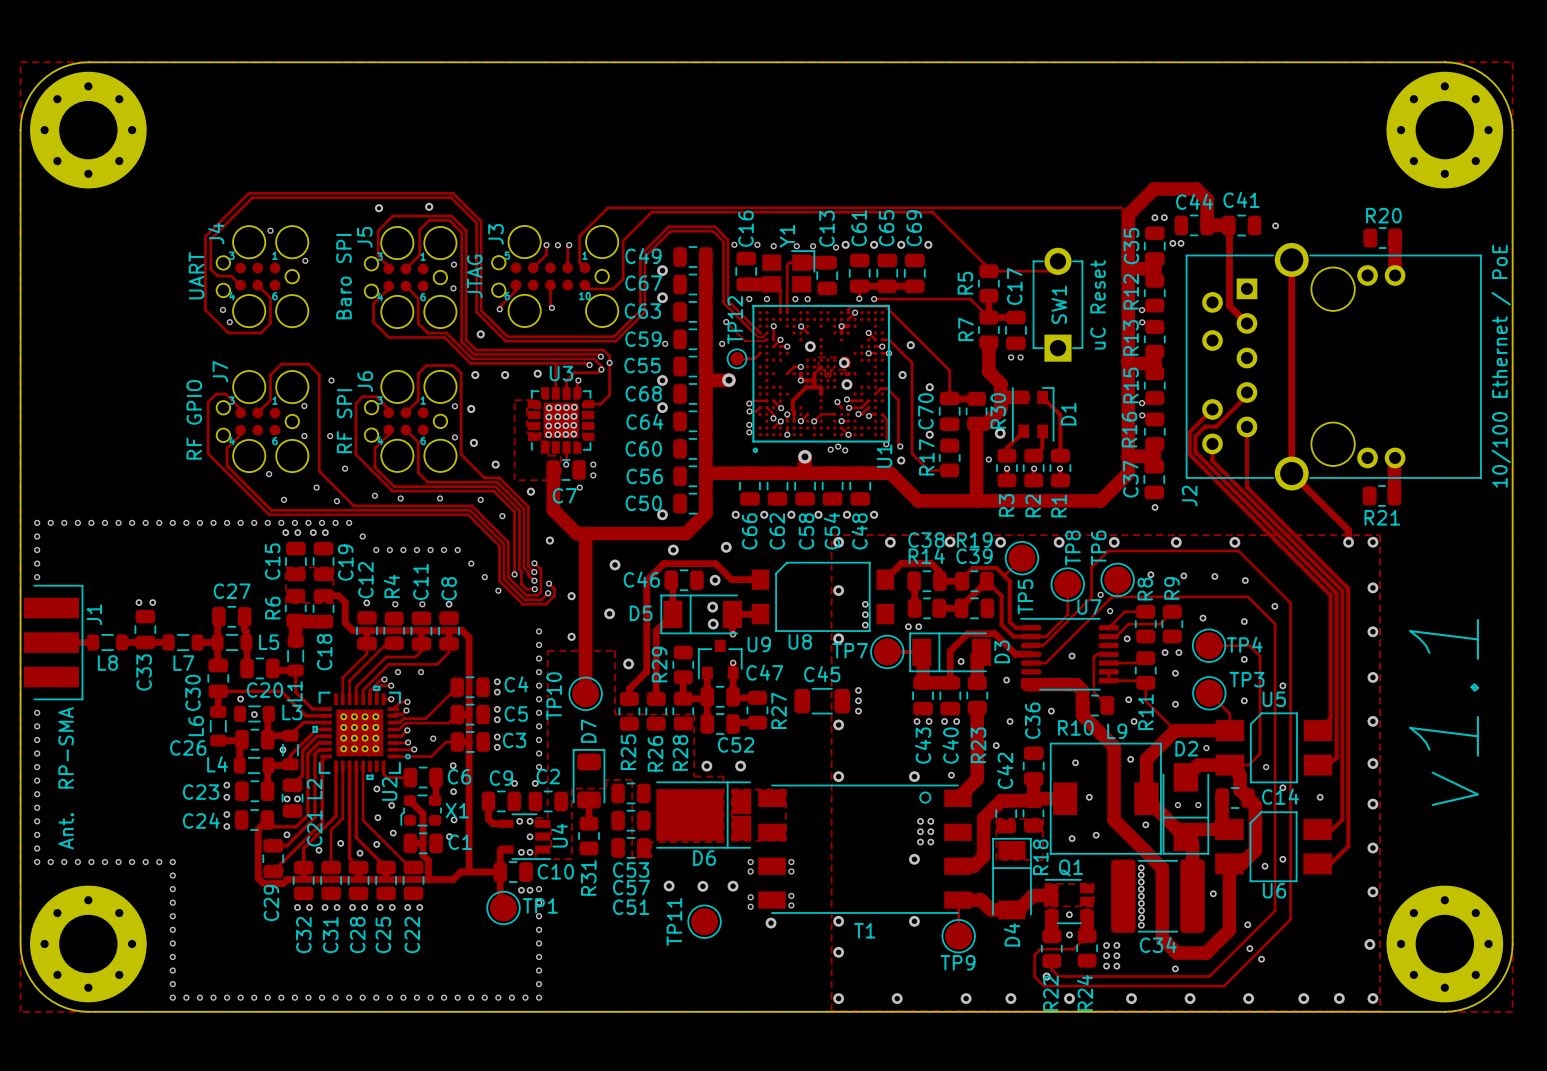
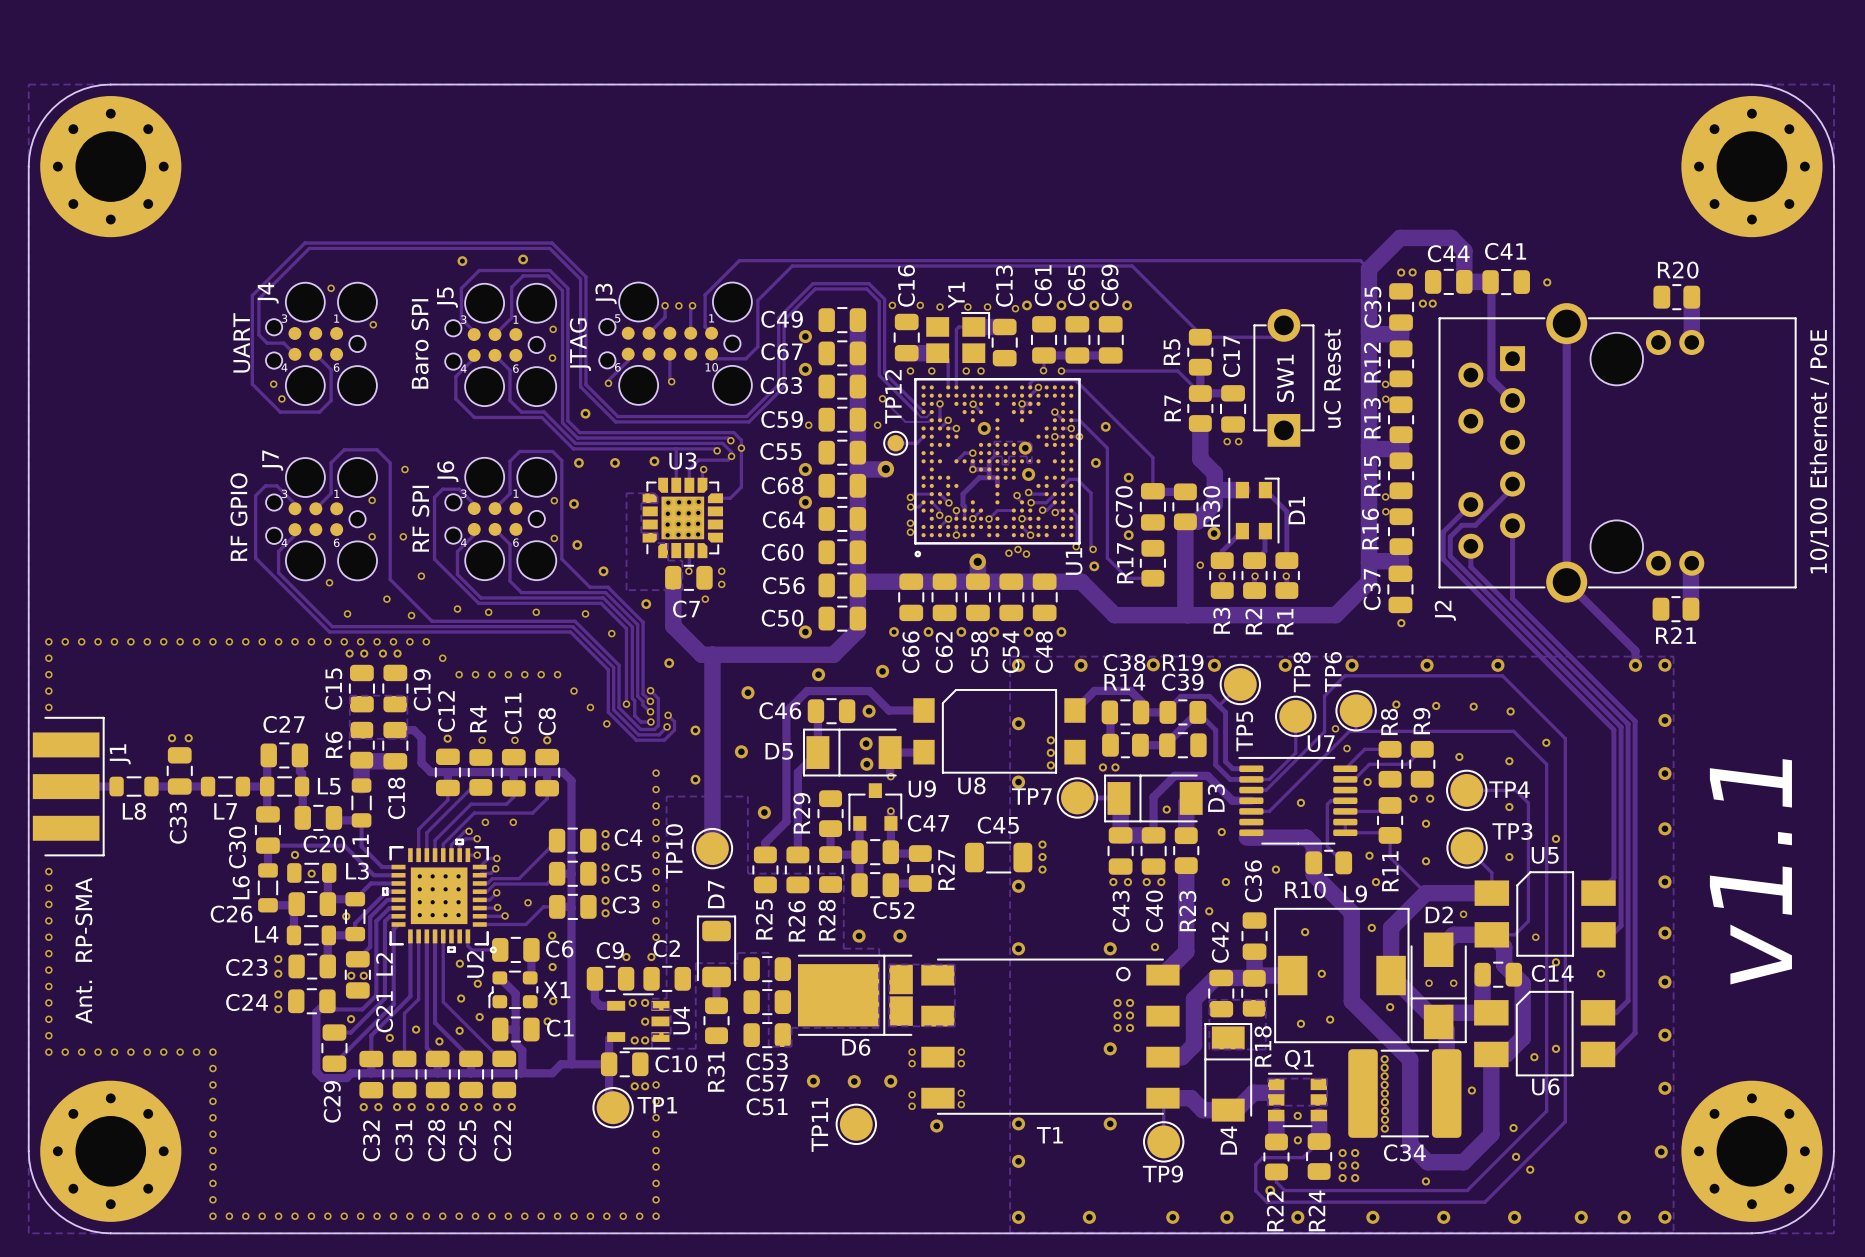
U2 footprint: [312, 685, 411, 781] -> [381, 838, 497, 954]

